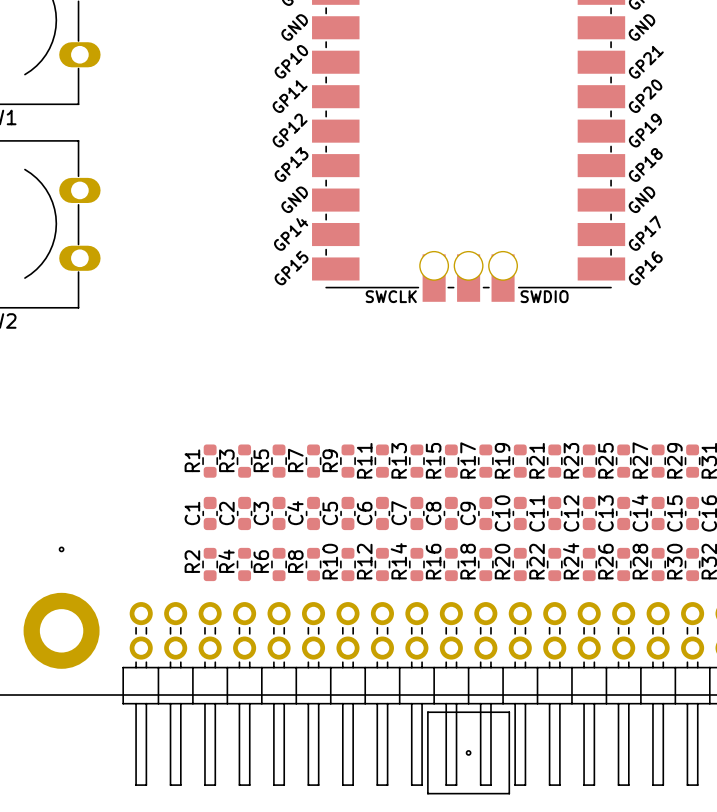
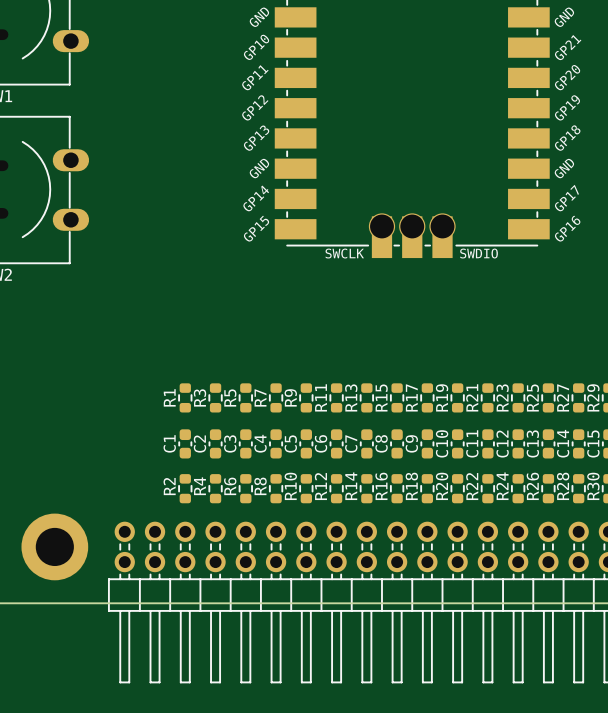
part: (61, 549) -> none
board edge: (427, 712) (509, 712) (509, 793) (427, 793) (427, 712) -> none
part: (468, 752) -> none

